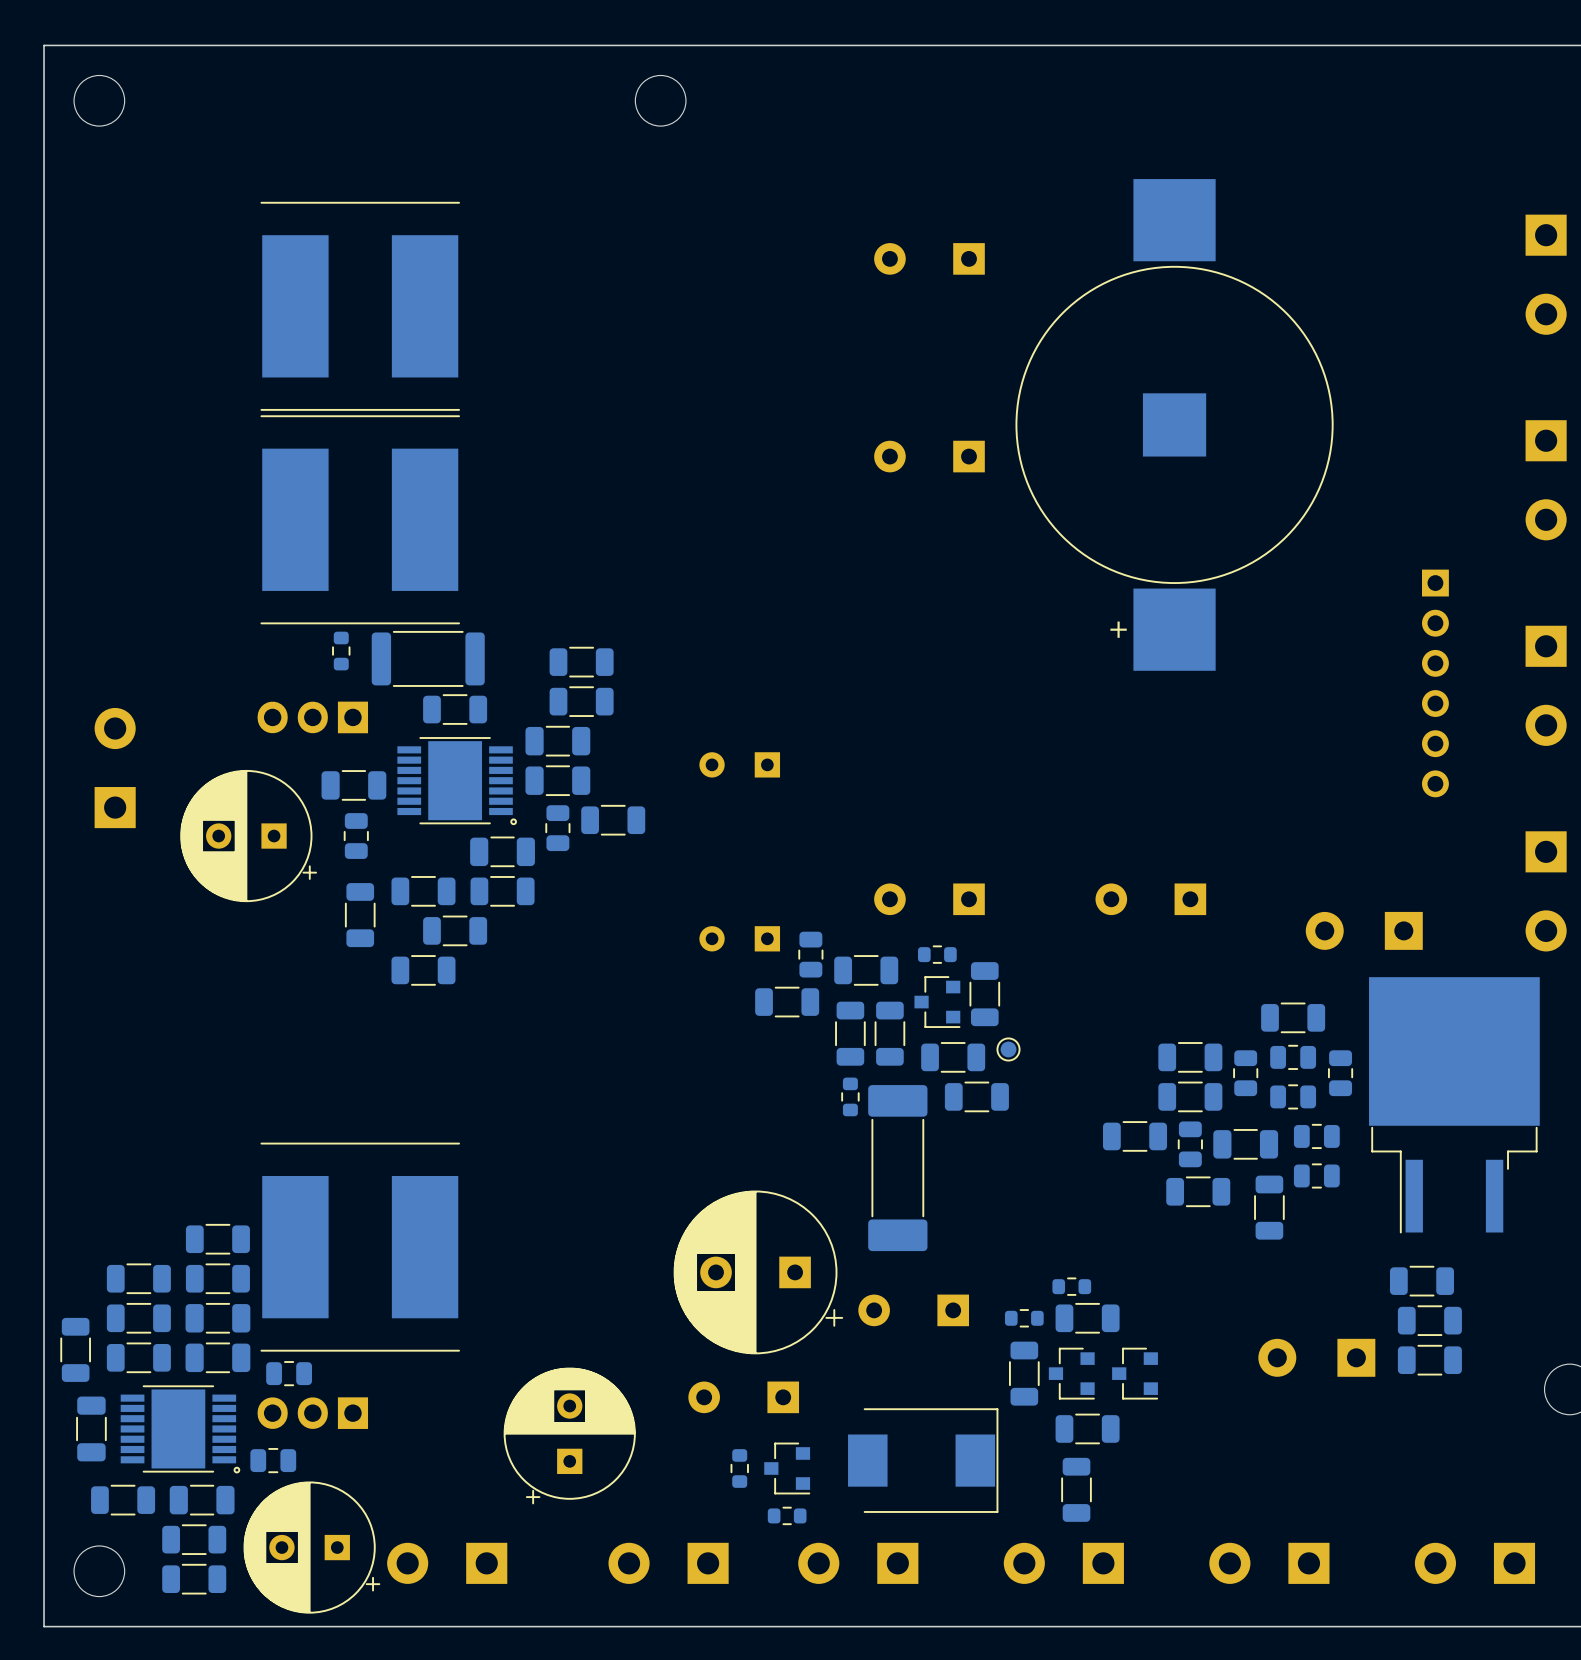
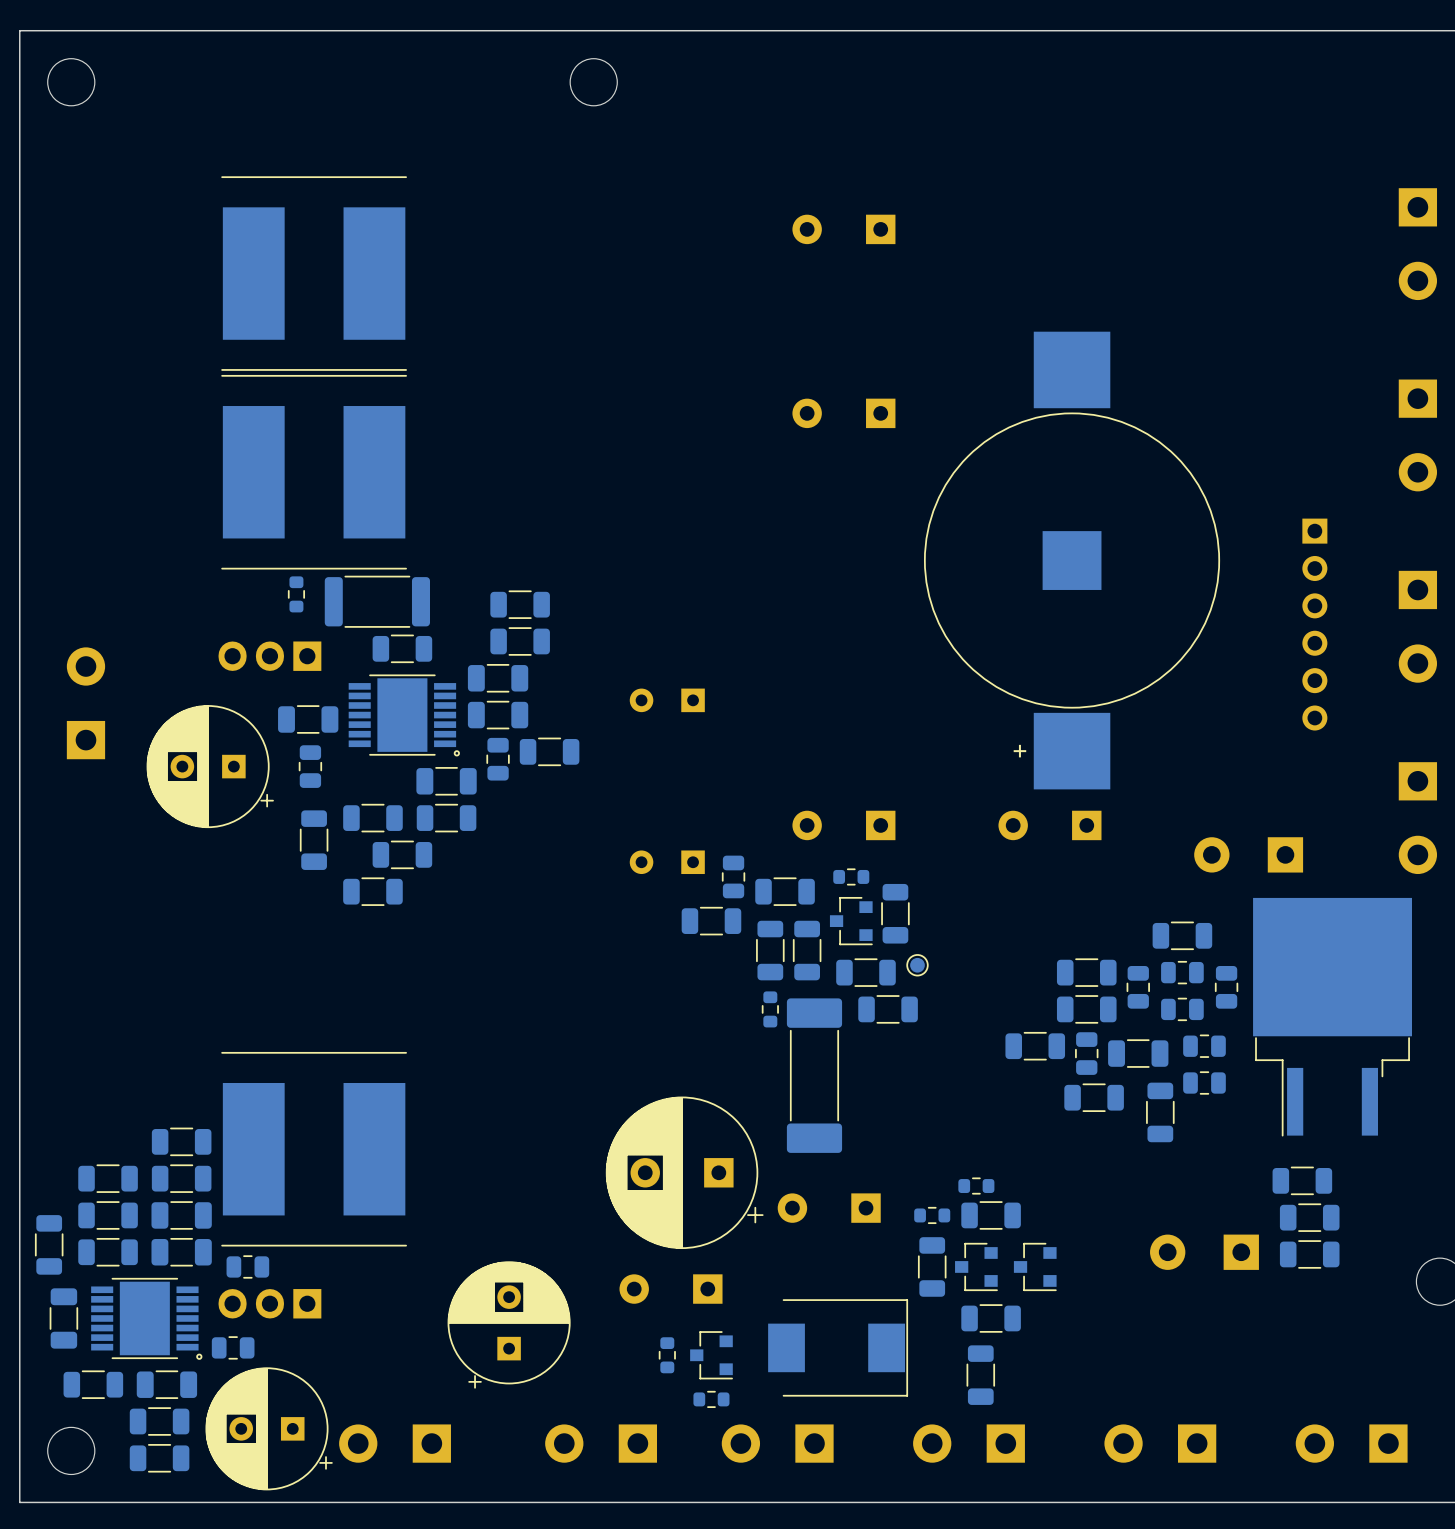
part position: (1174, 424) -> (1072, 560)

